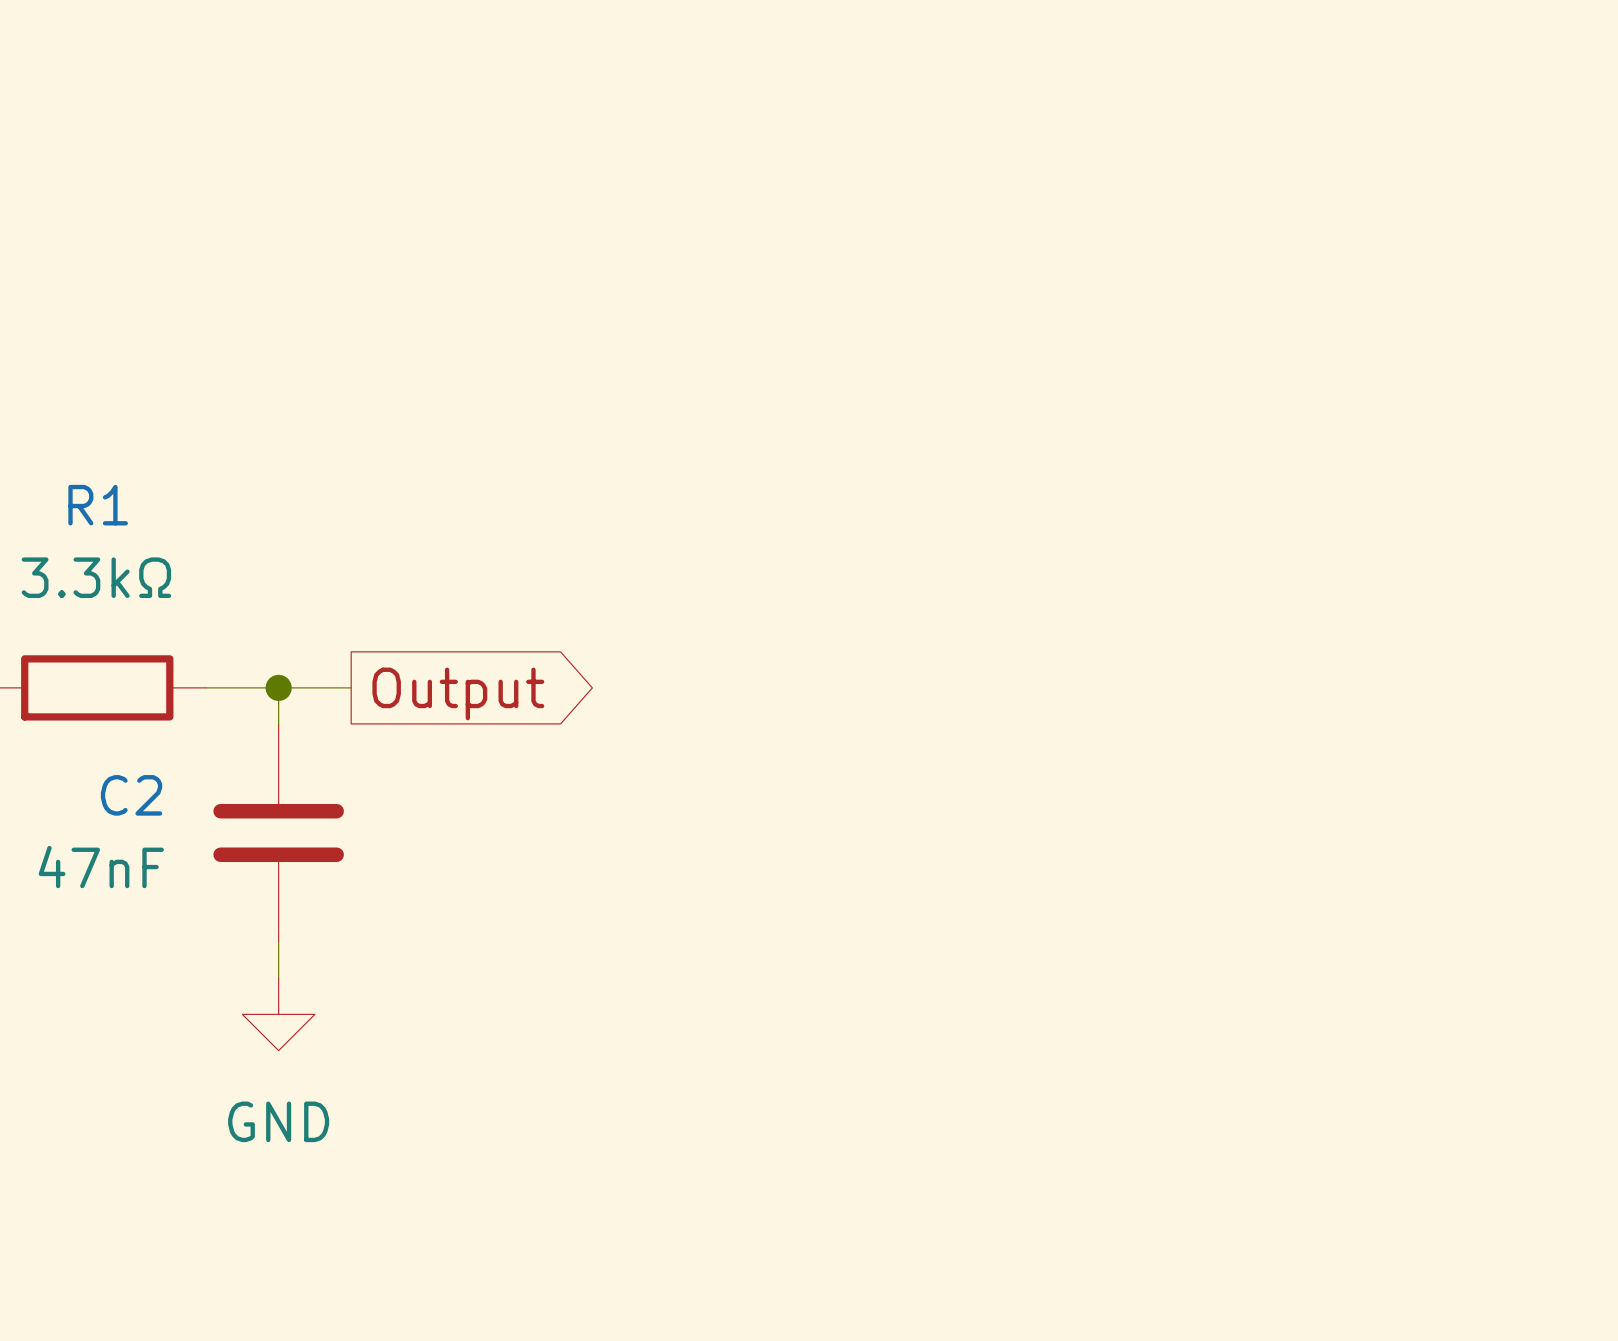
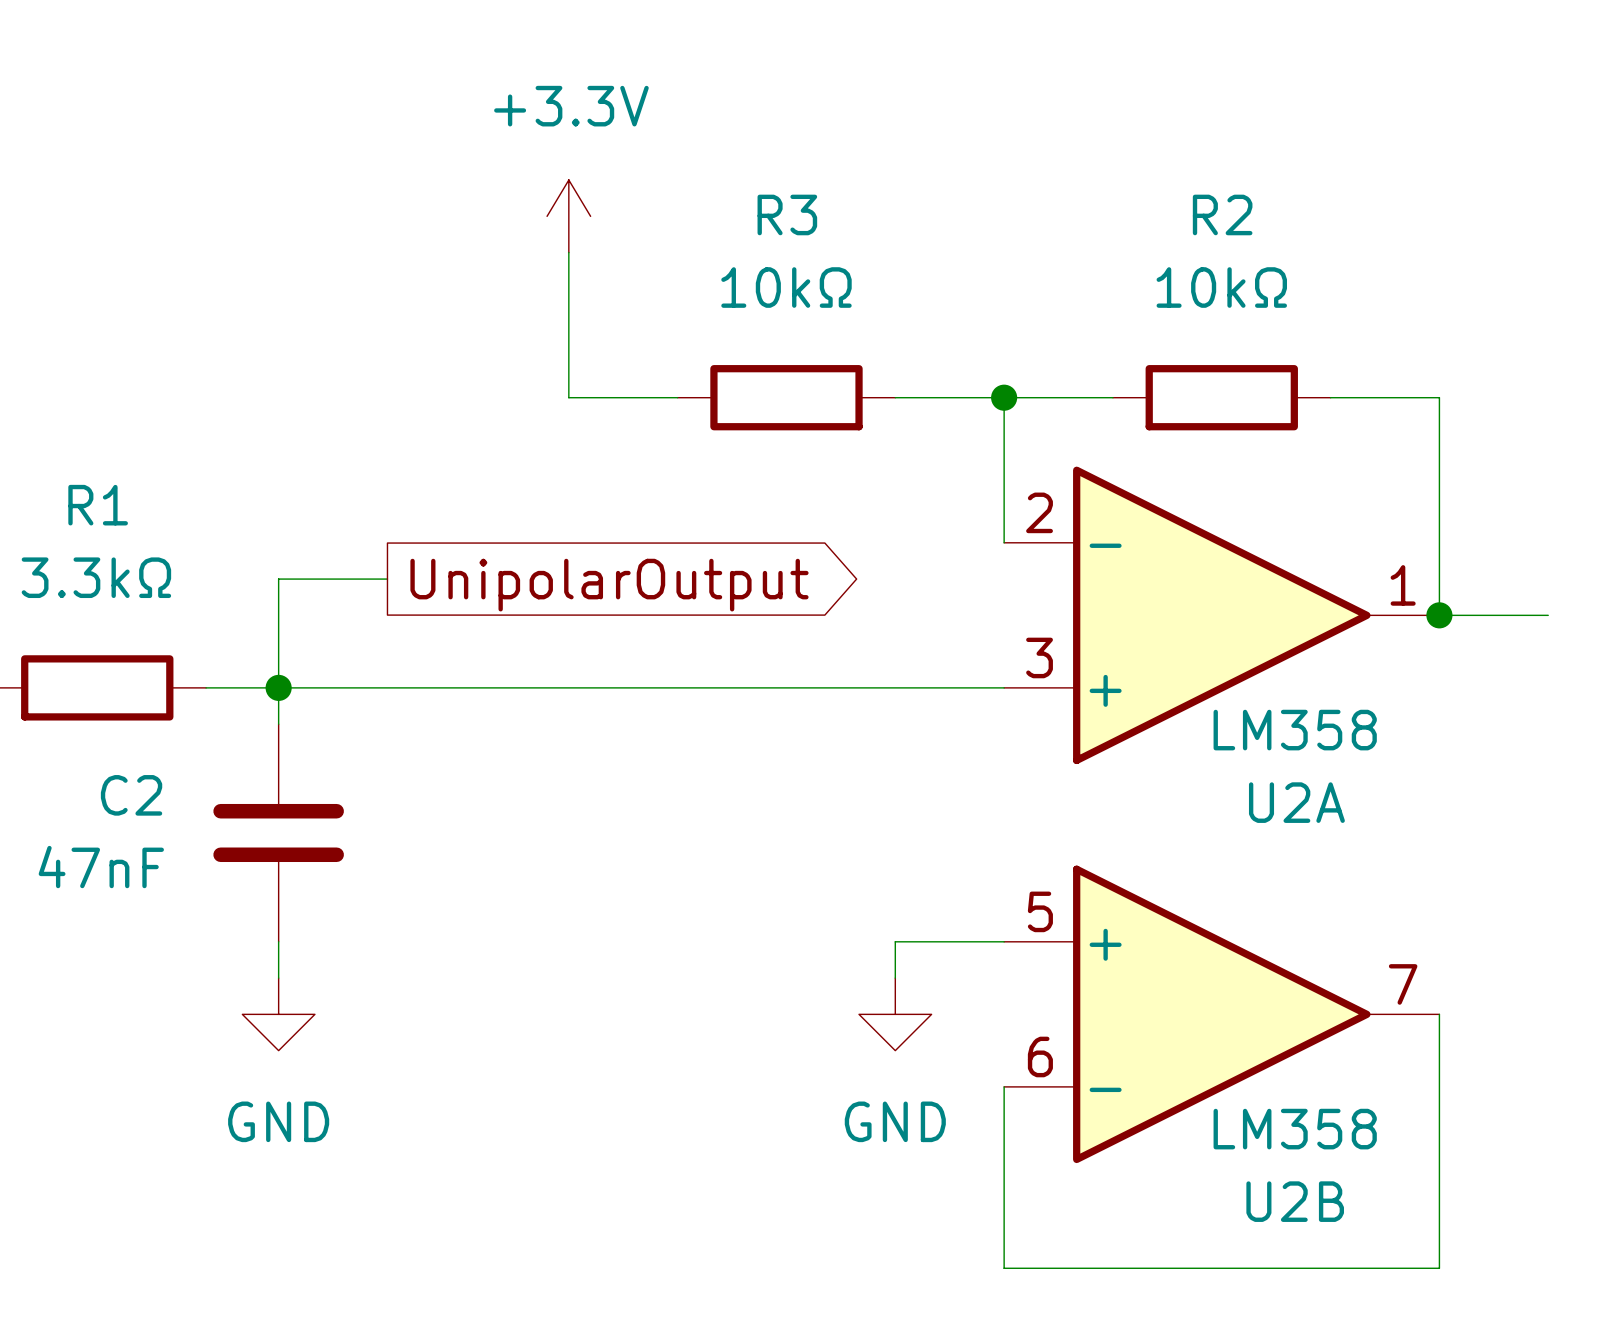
power symbol: none -> +3.3V (568, 216)
wire: none -> (568, 252) (568, 397) (677, 397)
R3: none -> 10kΩ (786, 397)
wire: none -> (895, 397) (1112, 397)
wire: none -> (1004, 397) (1004, 542)
junction: none -> (1004, 397)
R2: none -> 10kΩ (1221, 397)
wire: none -> (1330, 397) (1439, 397) (1439, 615) (1548, 615)
wire: none -> (387, 579) (278, 579) (278, 687)
global label: none -> UnipolarOutput (609, 585)
U2A: none -> LM358 (1221, 615)
junction: none -> (1439, 615)
wire: none -> (351, 687) (1004, 687)
global label: Output (458, 693) -> none
wire: none -> (1004, 941) (895, 941) (895, 978)
power symbol: none -> GND (895, 1014)
U2B: none -> LM358 (1221, 1014)
wire: none -> (1439, 1014) (1439, 1268) (1004, 1268) (1004, 1086)

